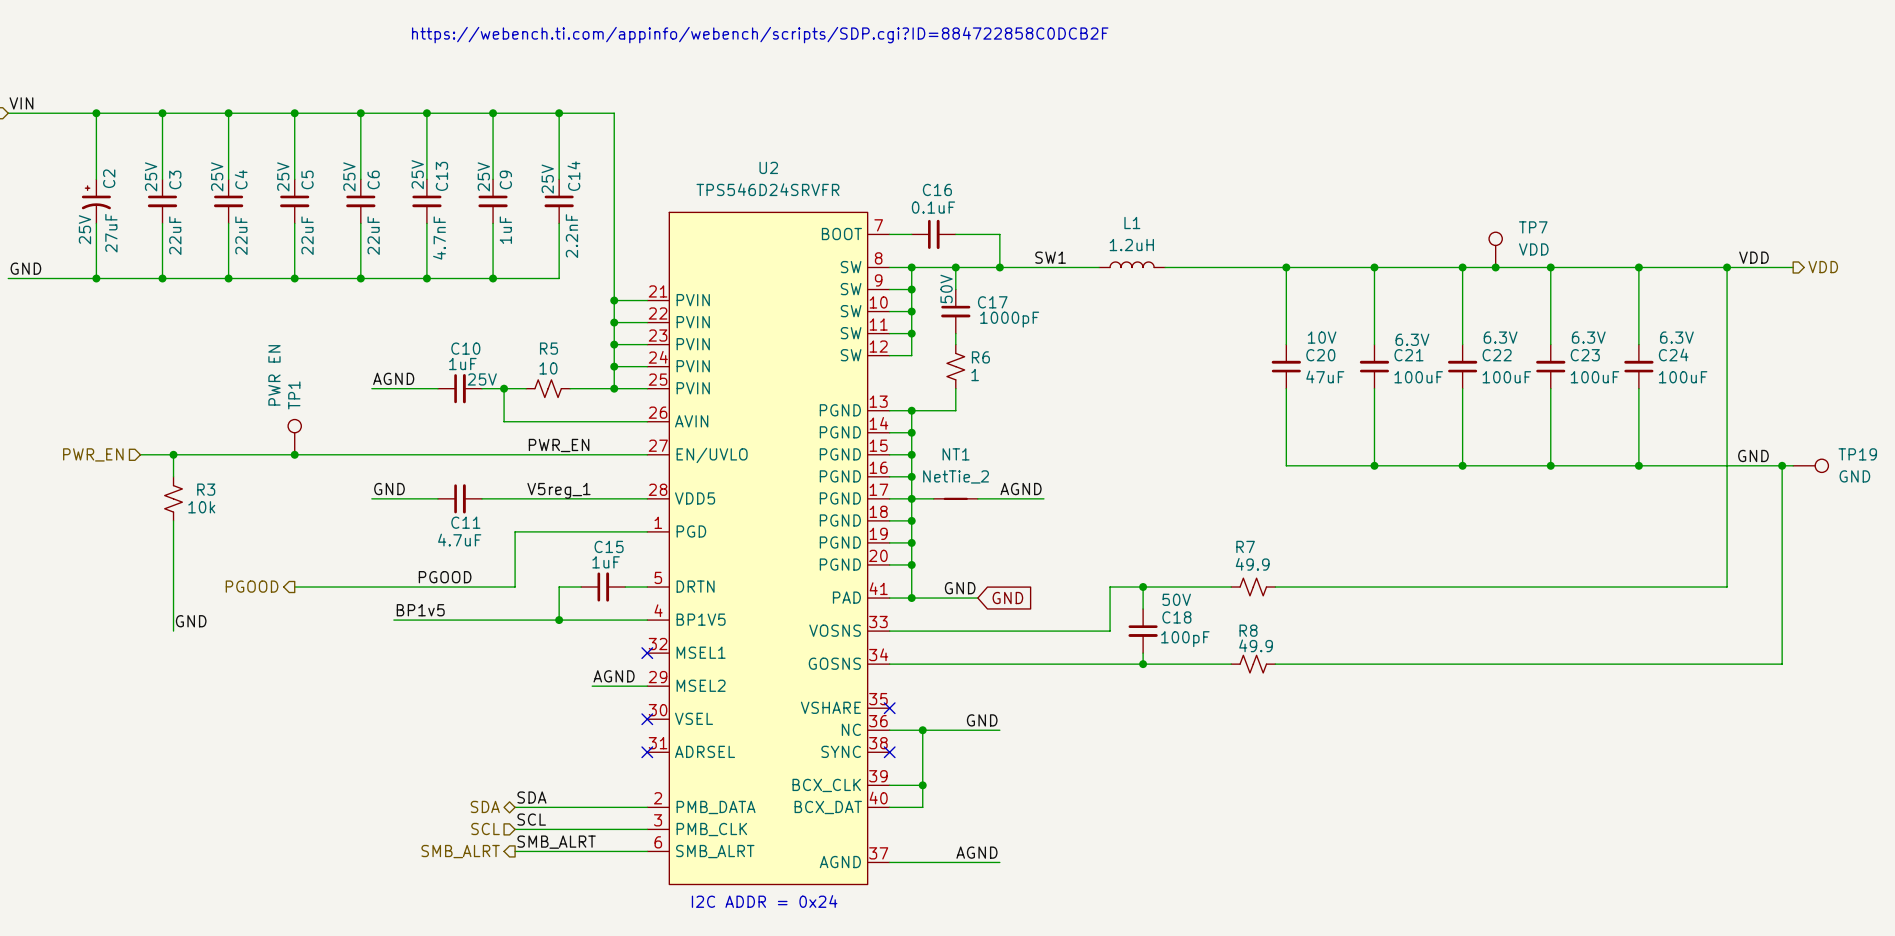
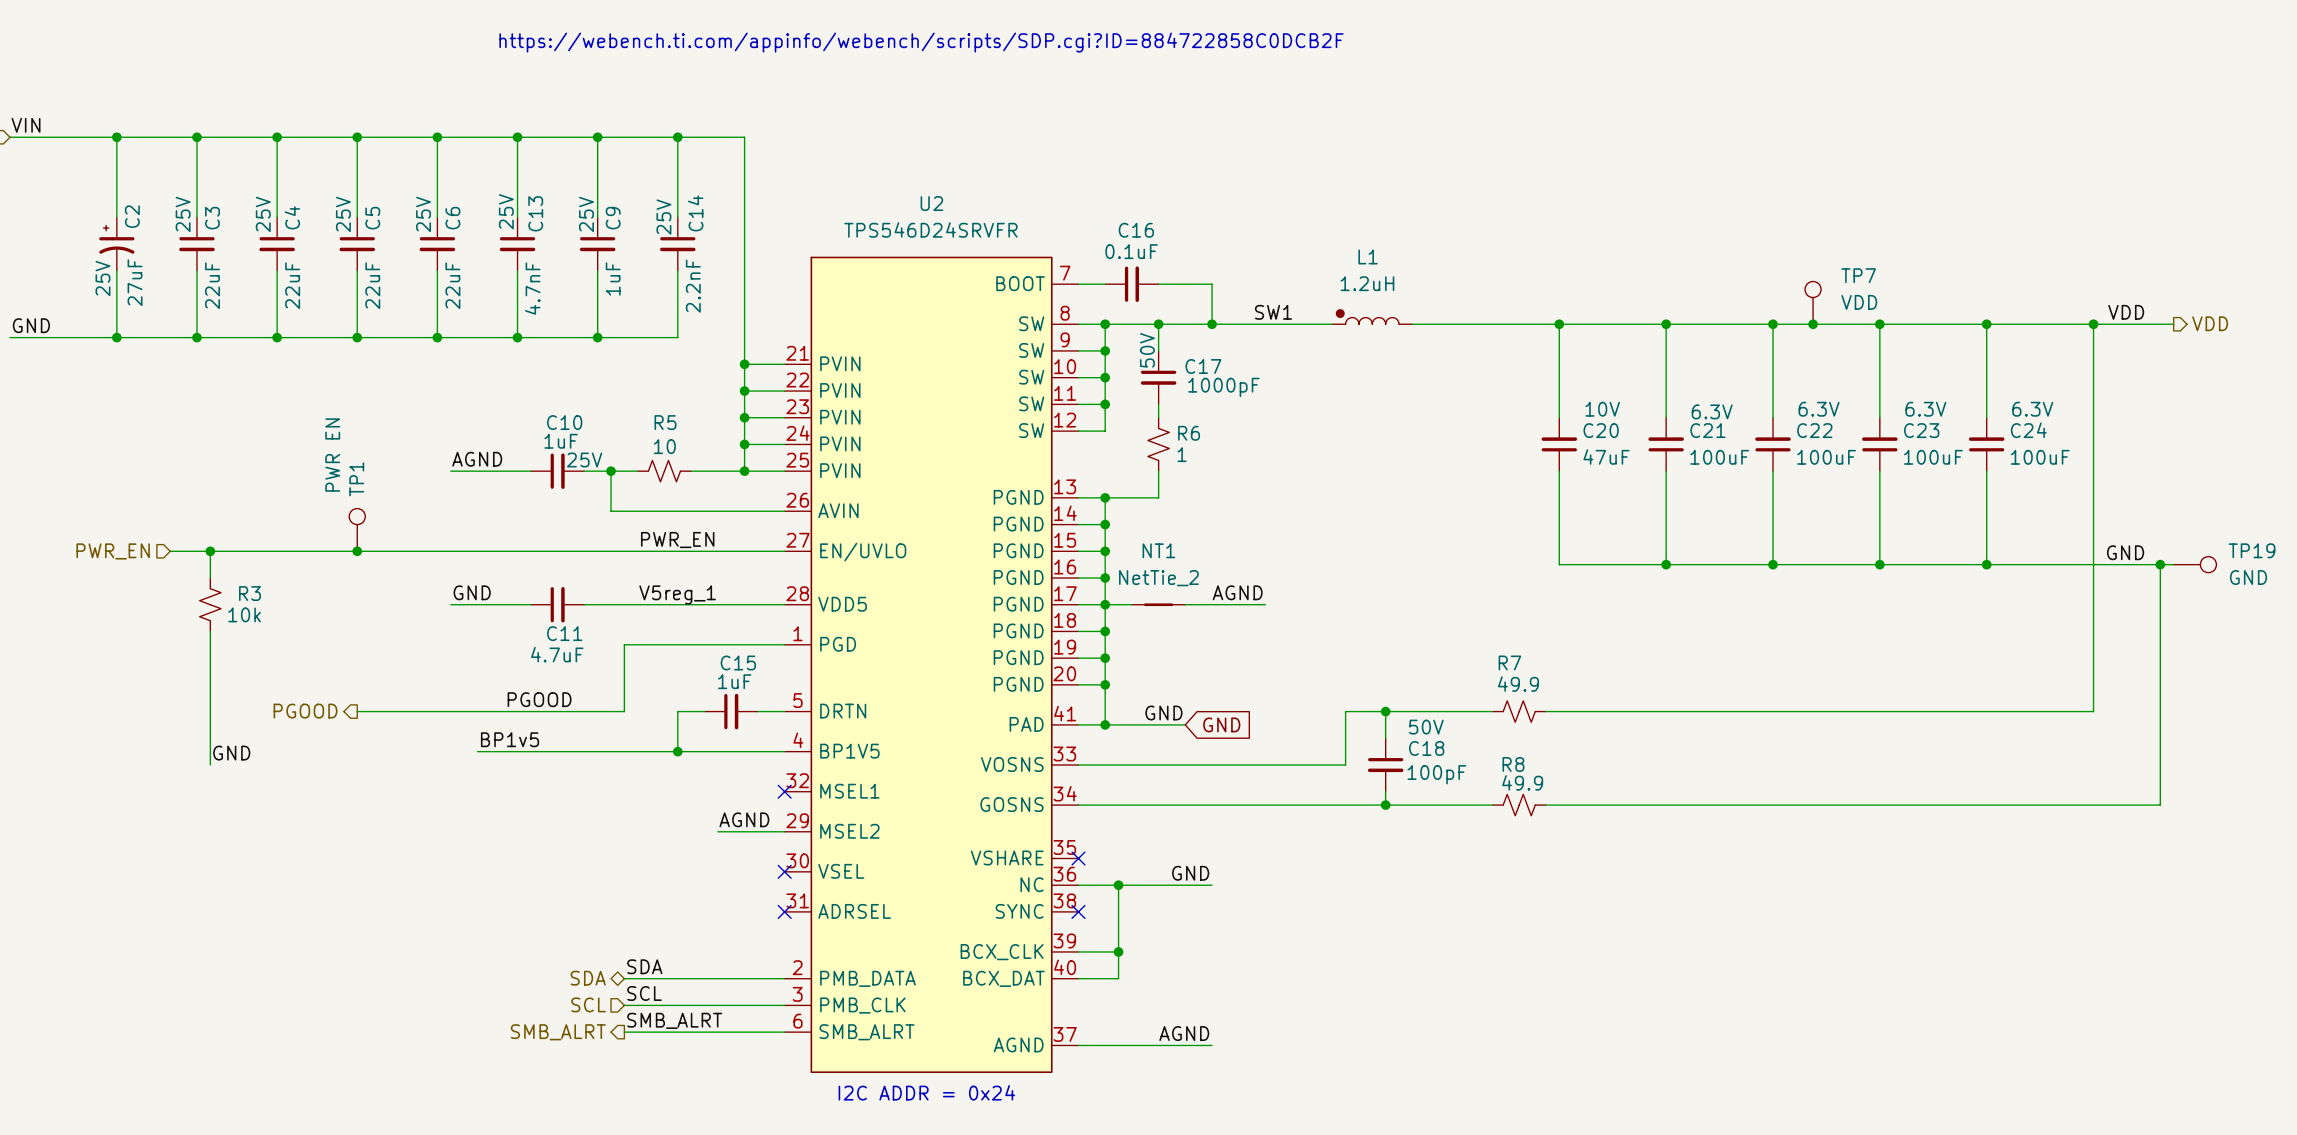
L1 symbol: [1099, 262, 1166, 268] -> [1332, 309, 1413, 325]

